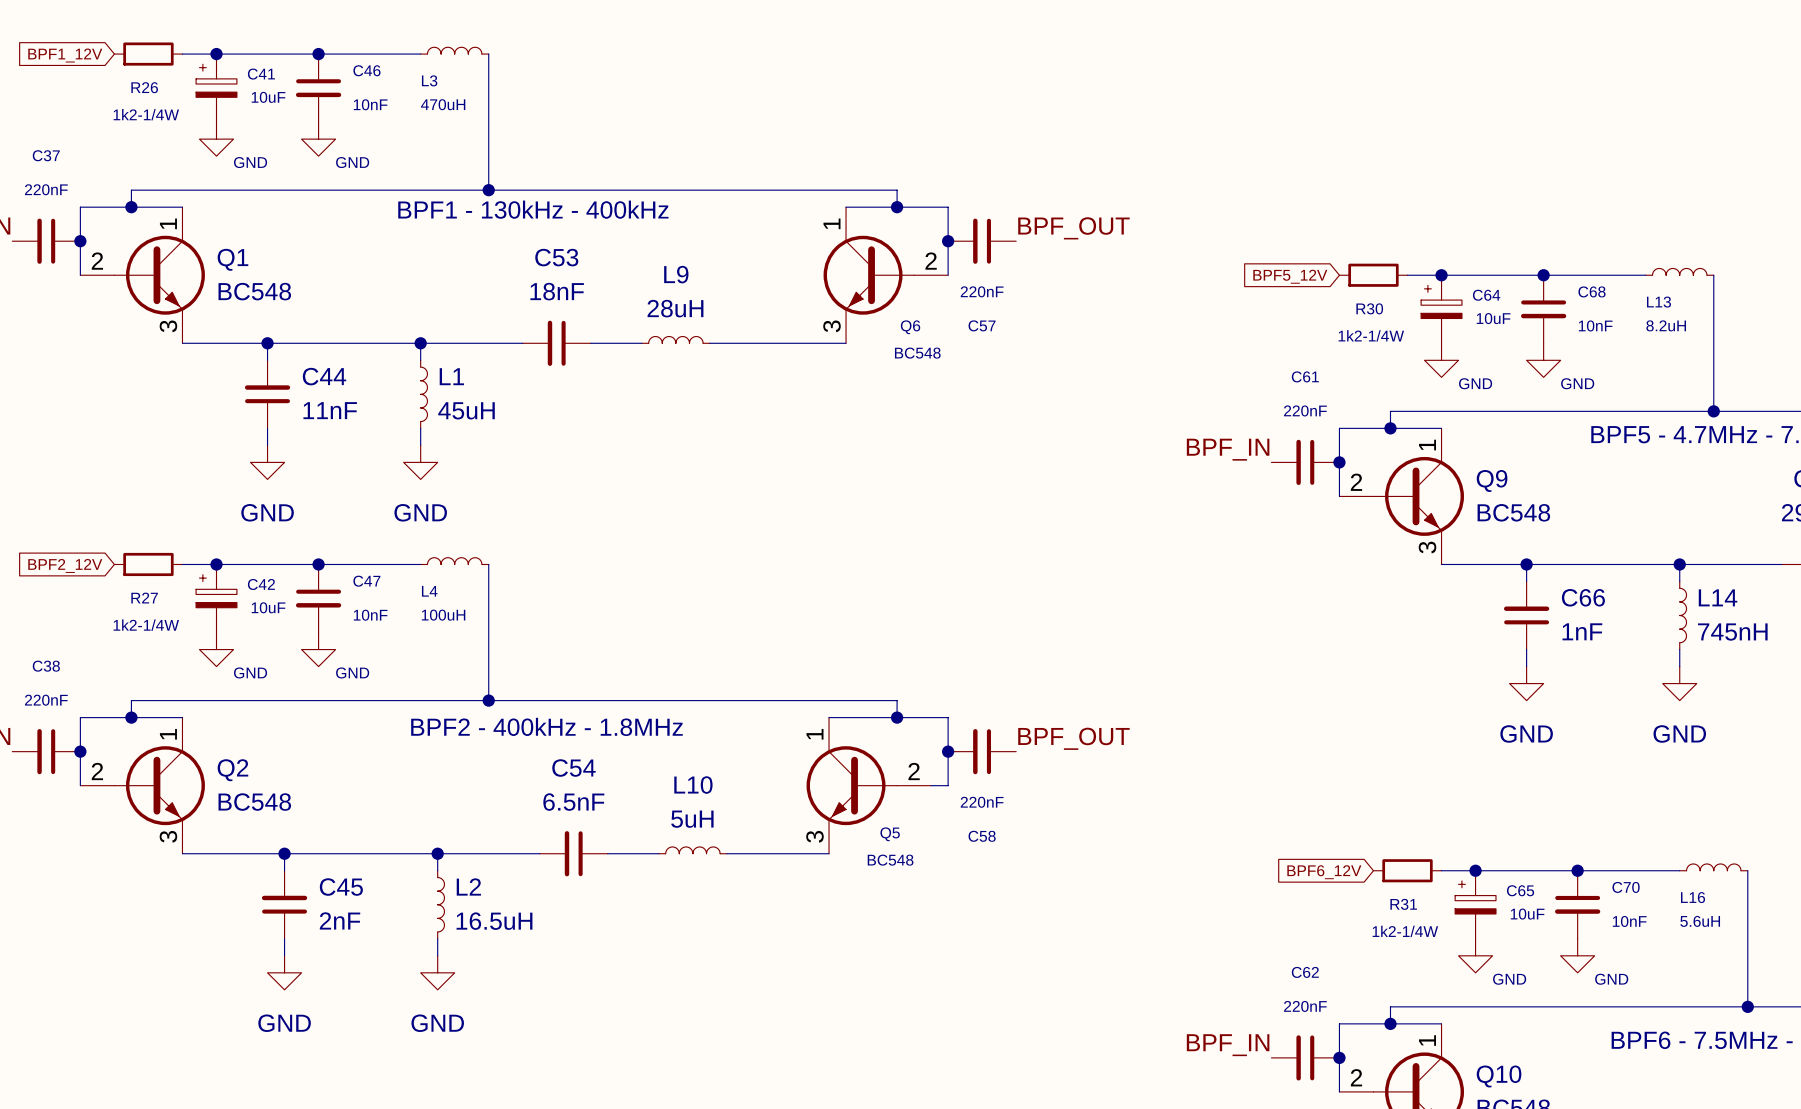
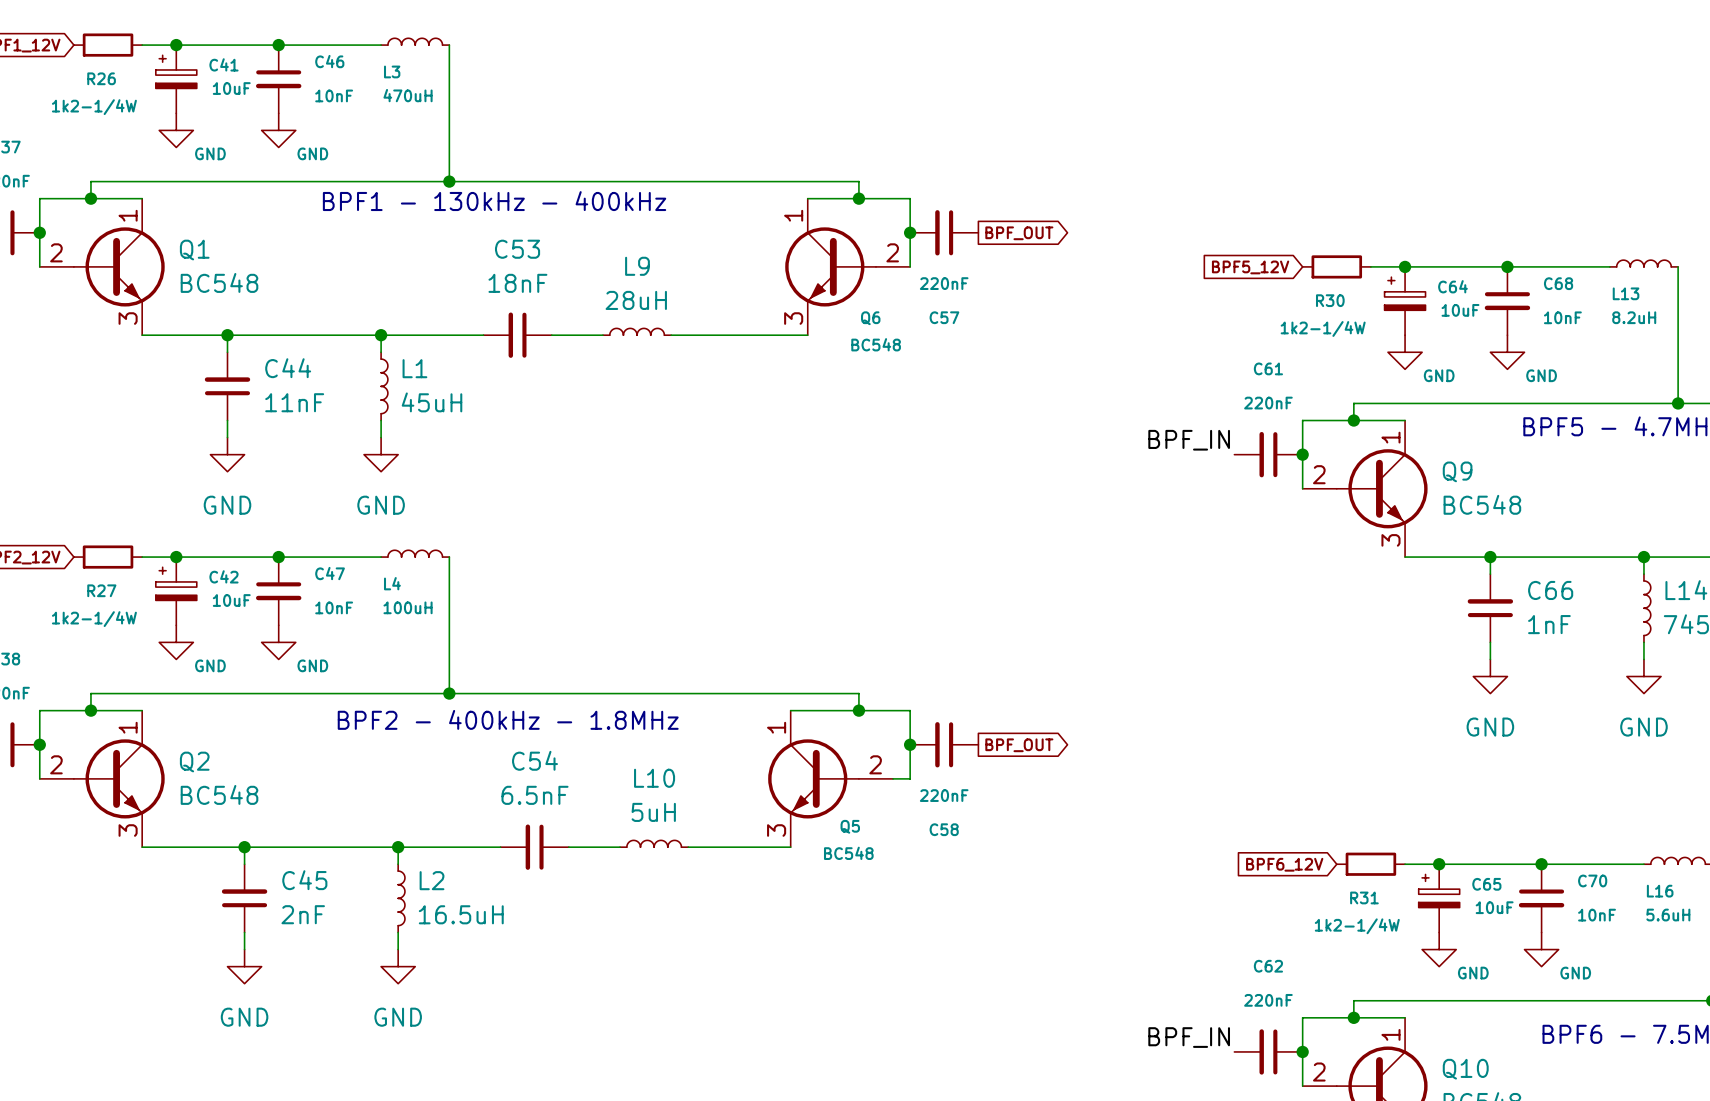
label: BPF_OUT (1073, 228) -> none
global label: none -> BPF_OUT (1019, 233)
label: BPF_OUT (1073, 738) -> none
global label: none -> BPF_OUT (1019, 745)

